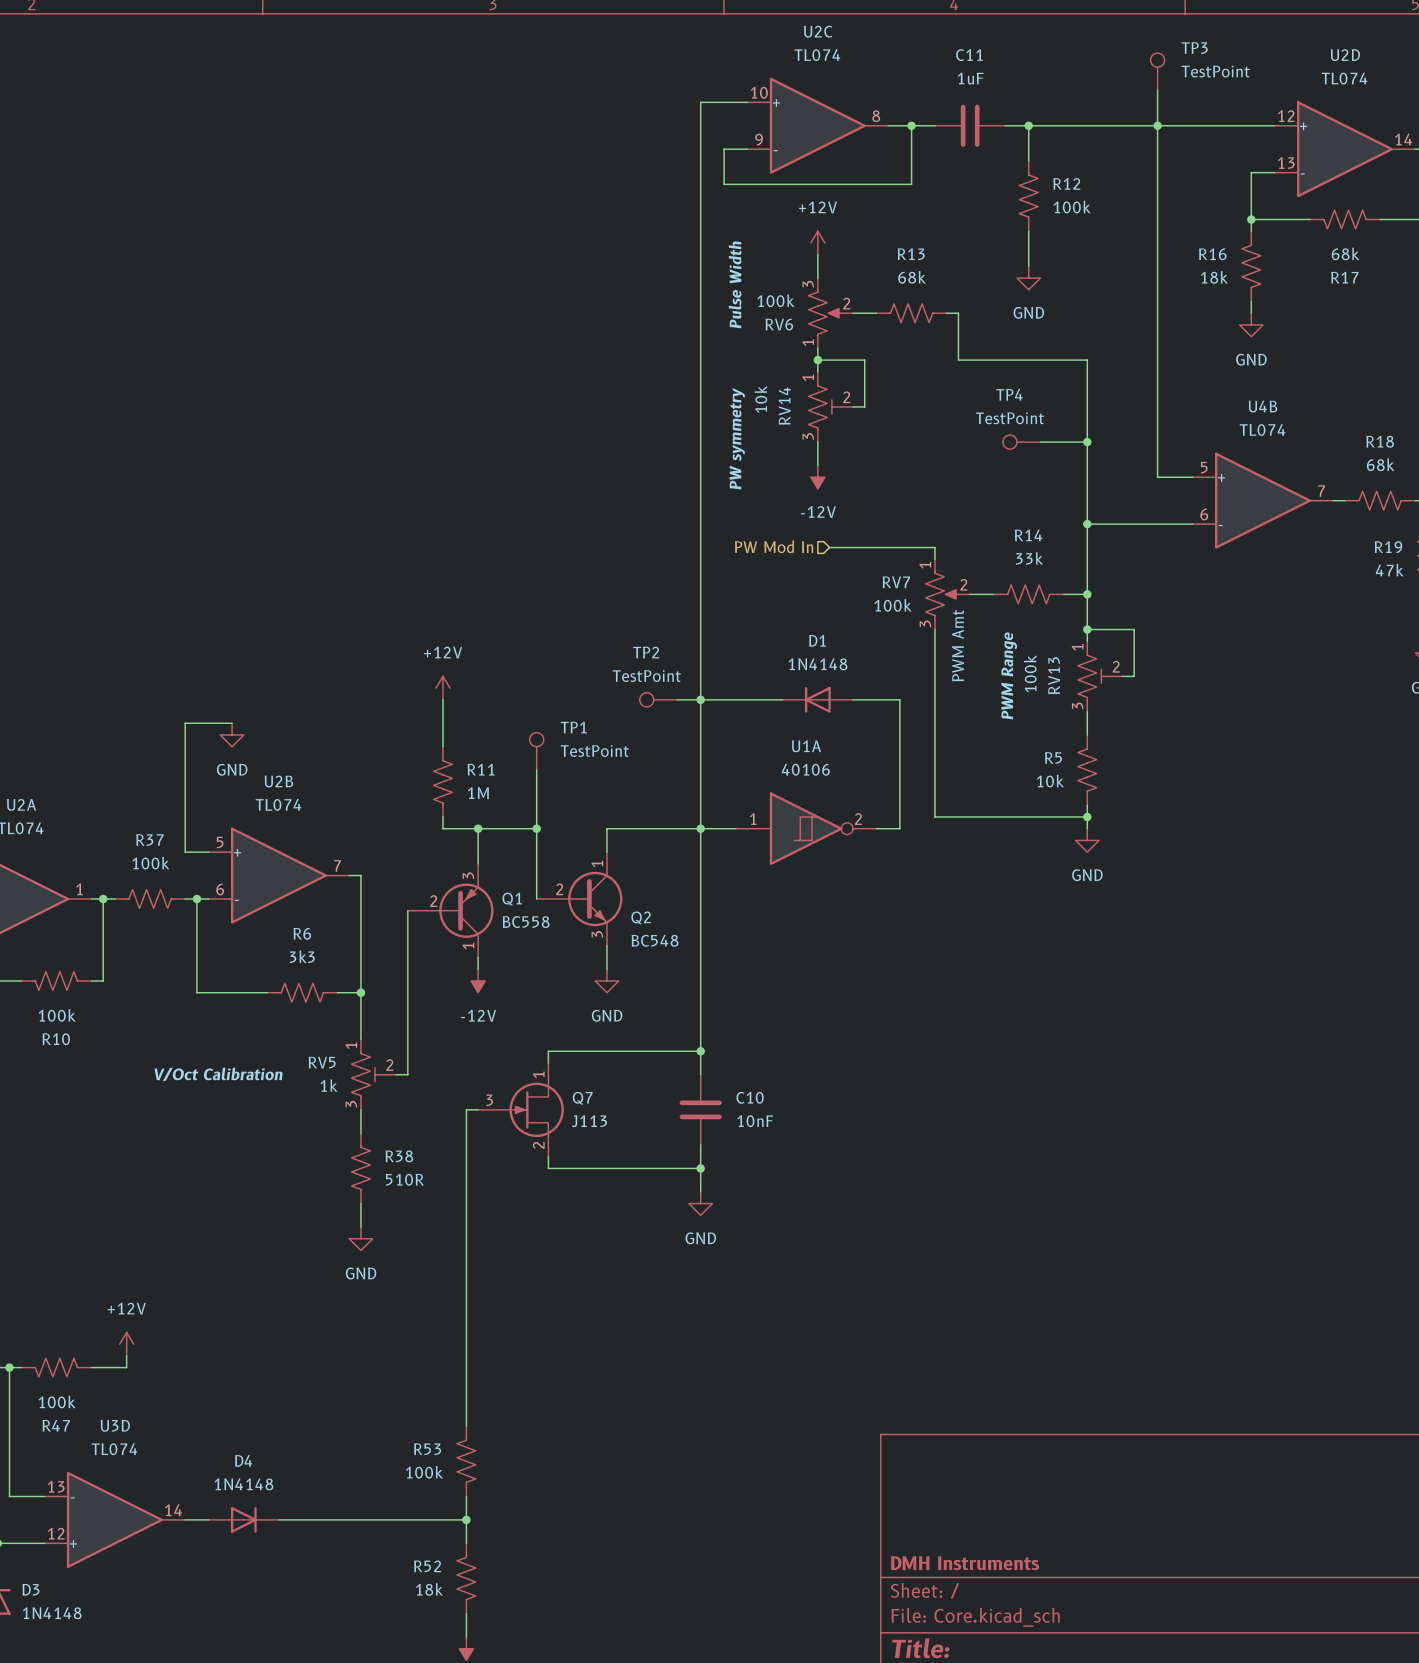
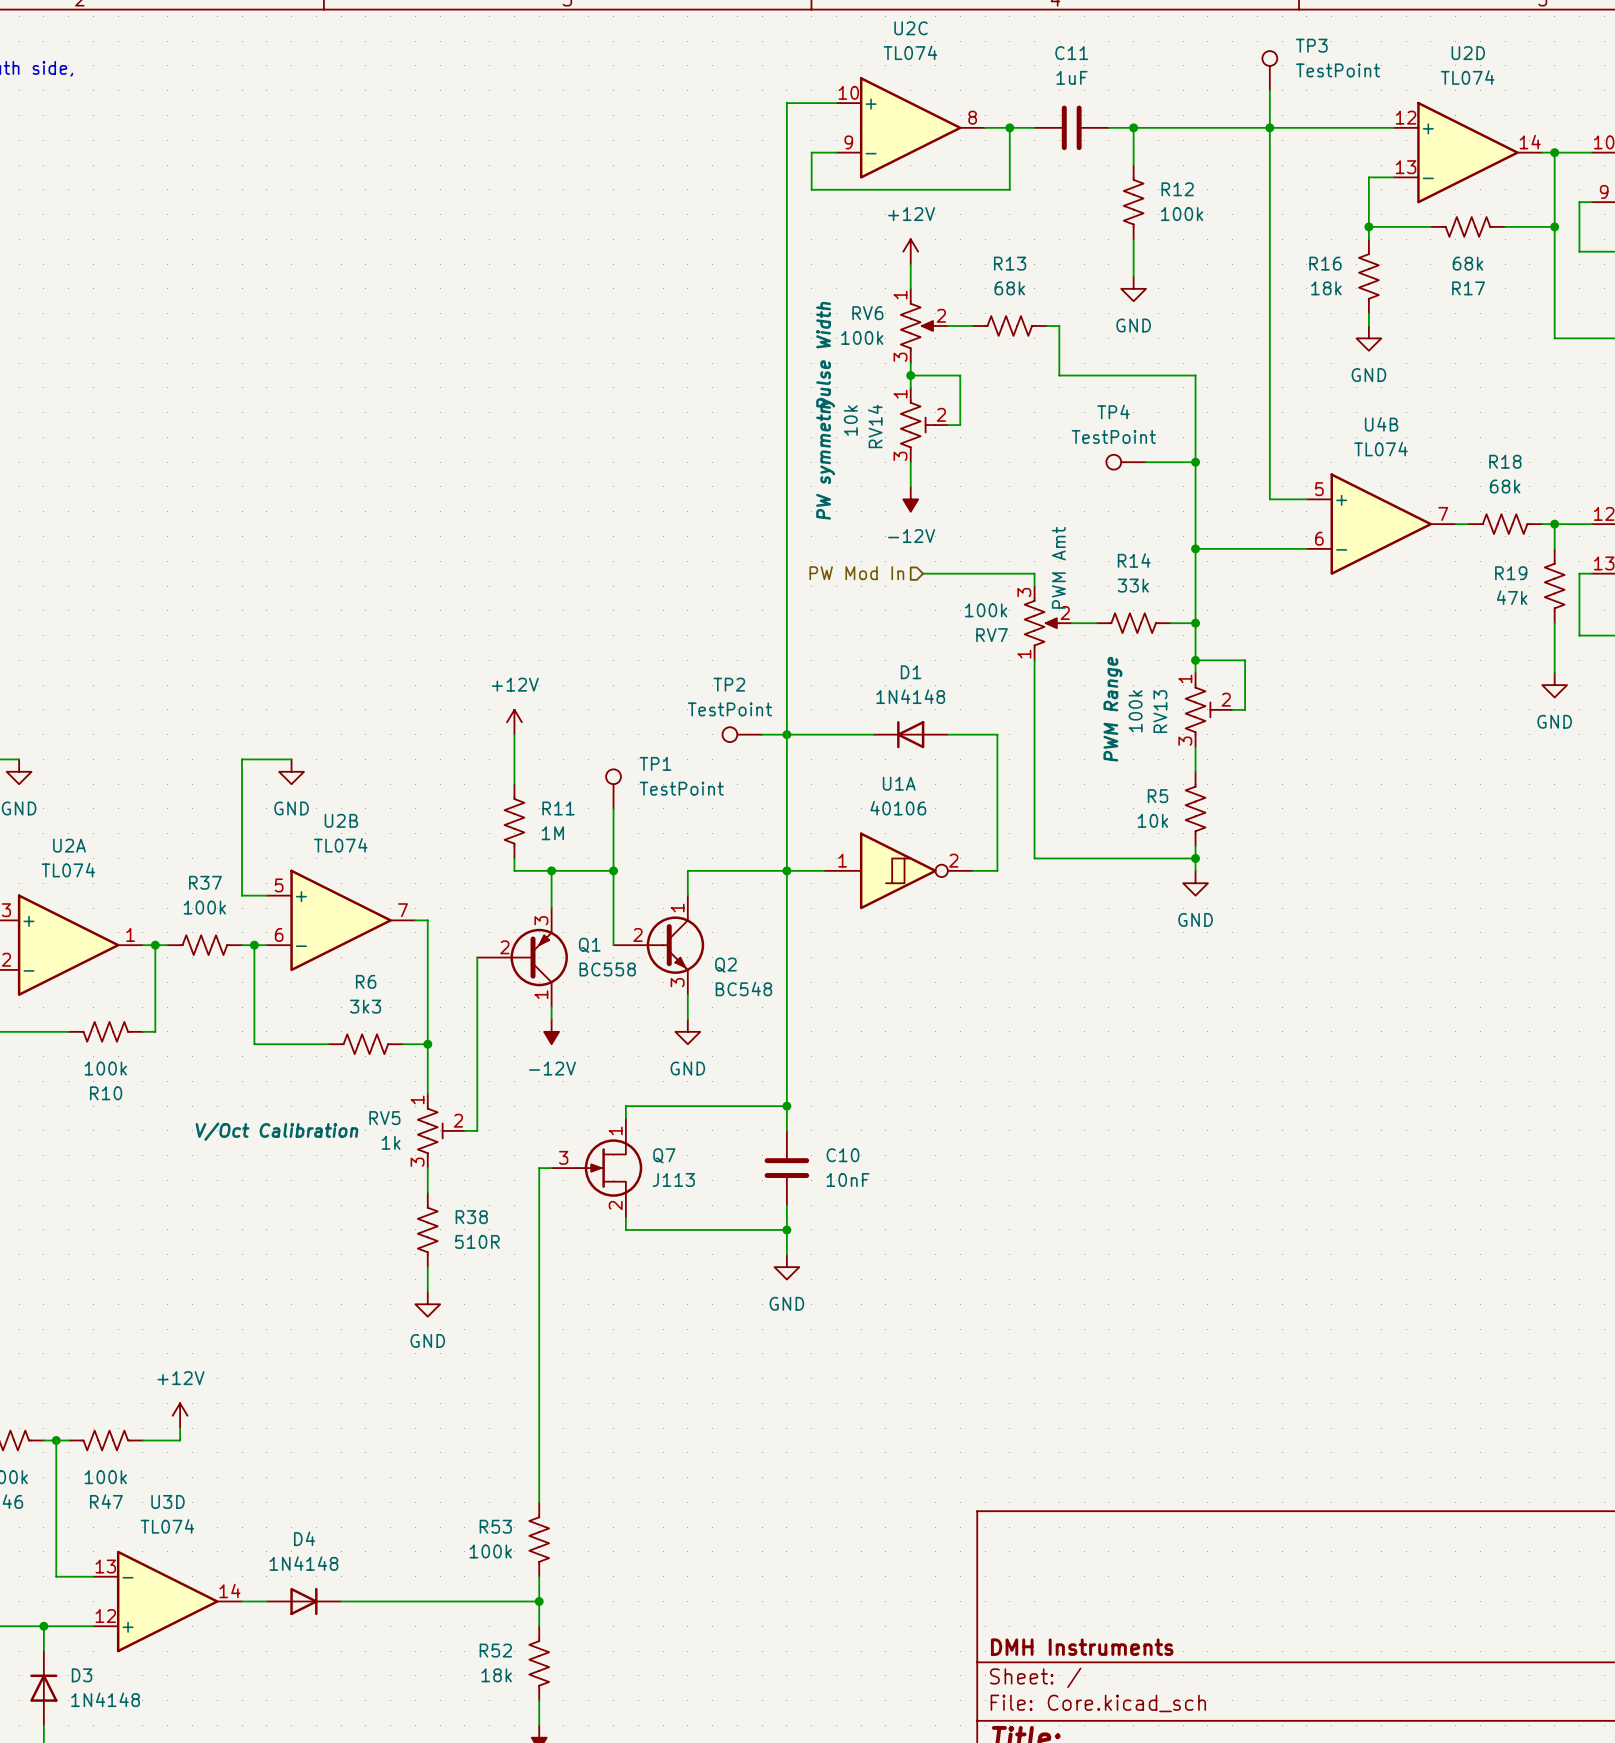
RV6 flip: as is (824, 313) -> up-down (918, 326)
RV7 flip: as is (942, 594) -> up-down (1041, 623)

